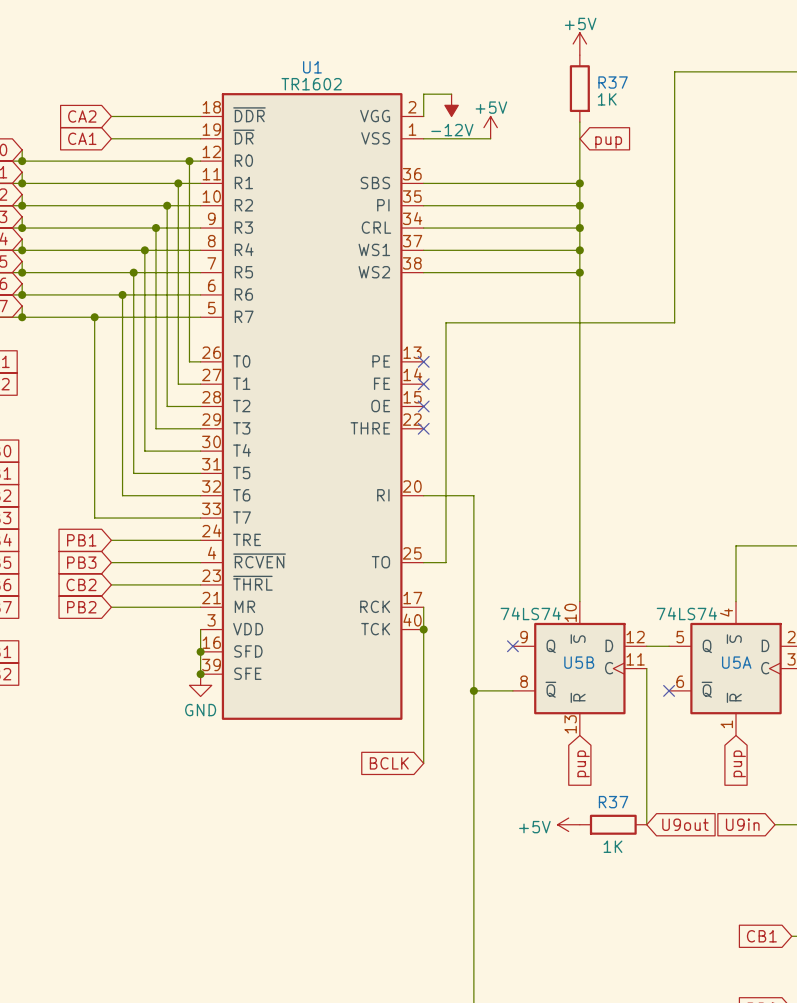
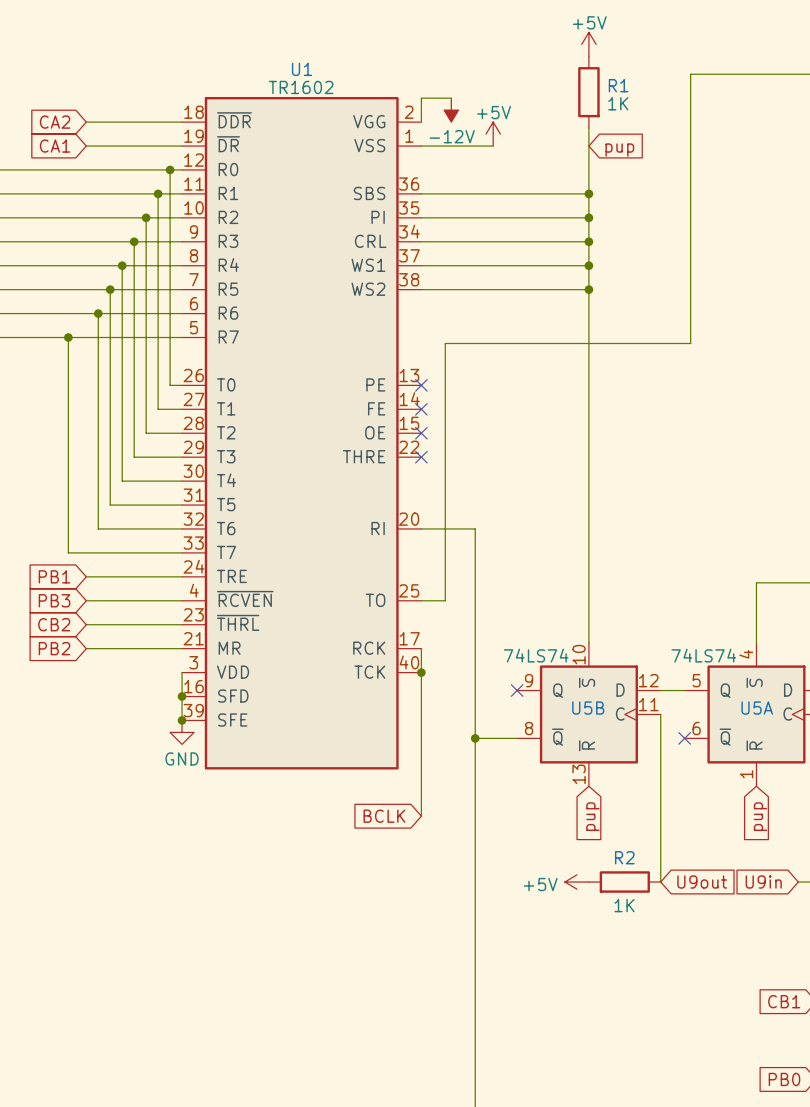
R37 name: R37 (613, 82) -> R1 (618, 85)
R37 name: R37 (613, 802) -> R2 (624, 857)

